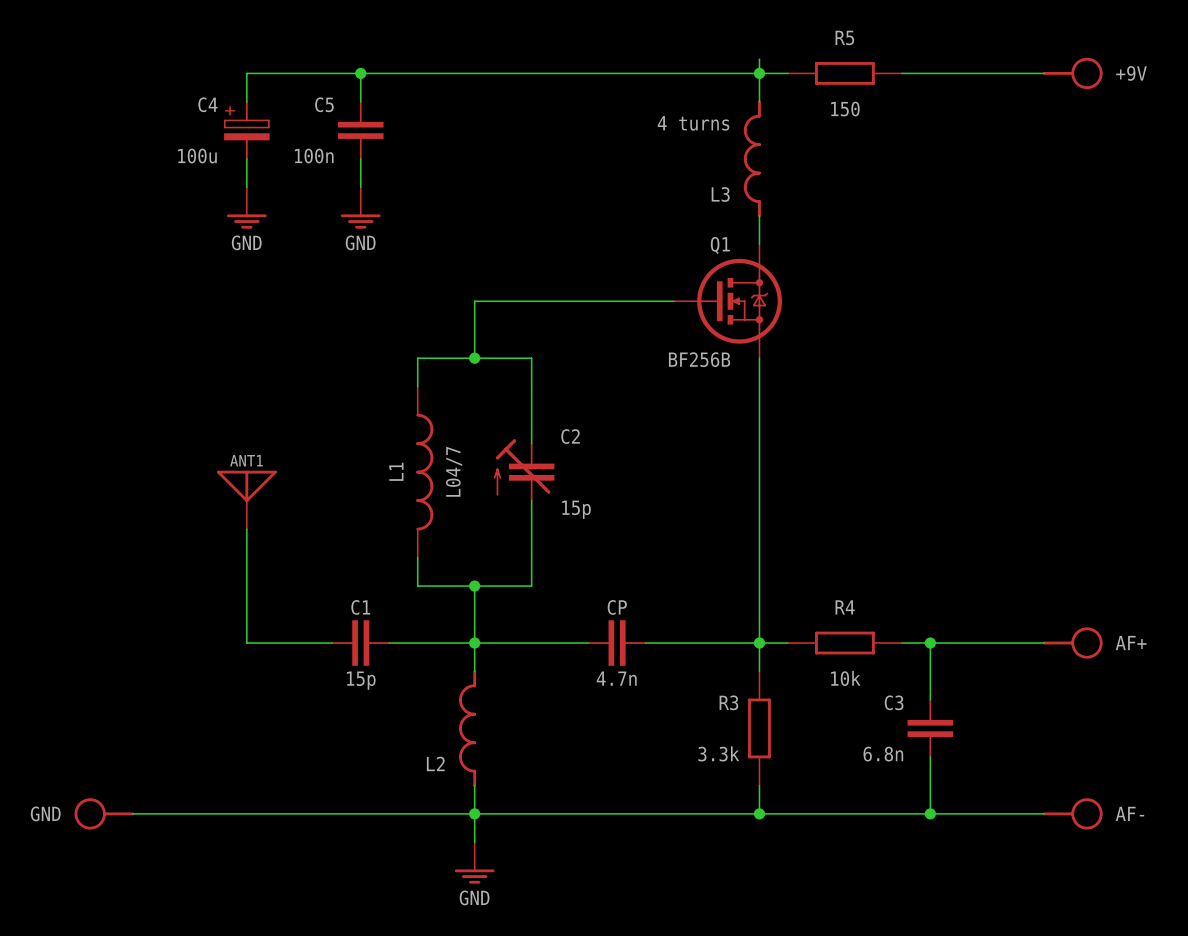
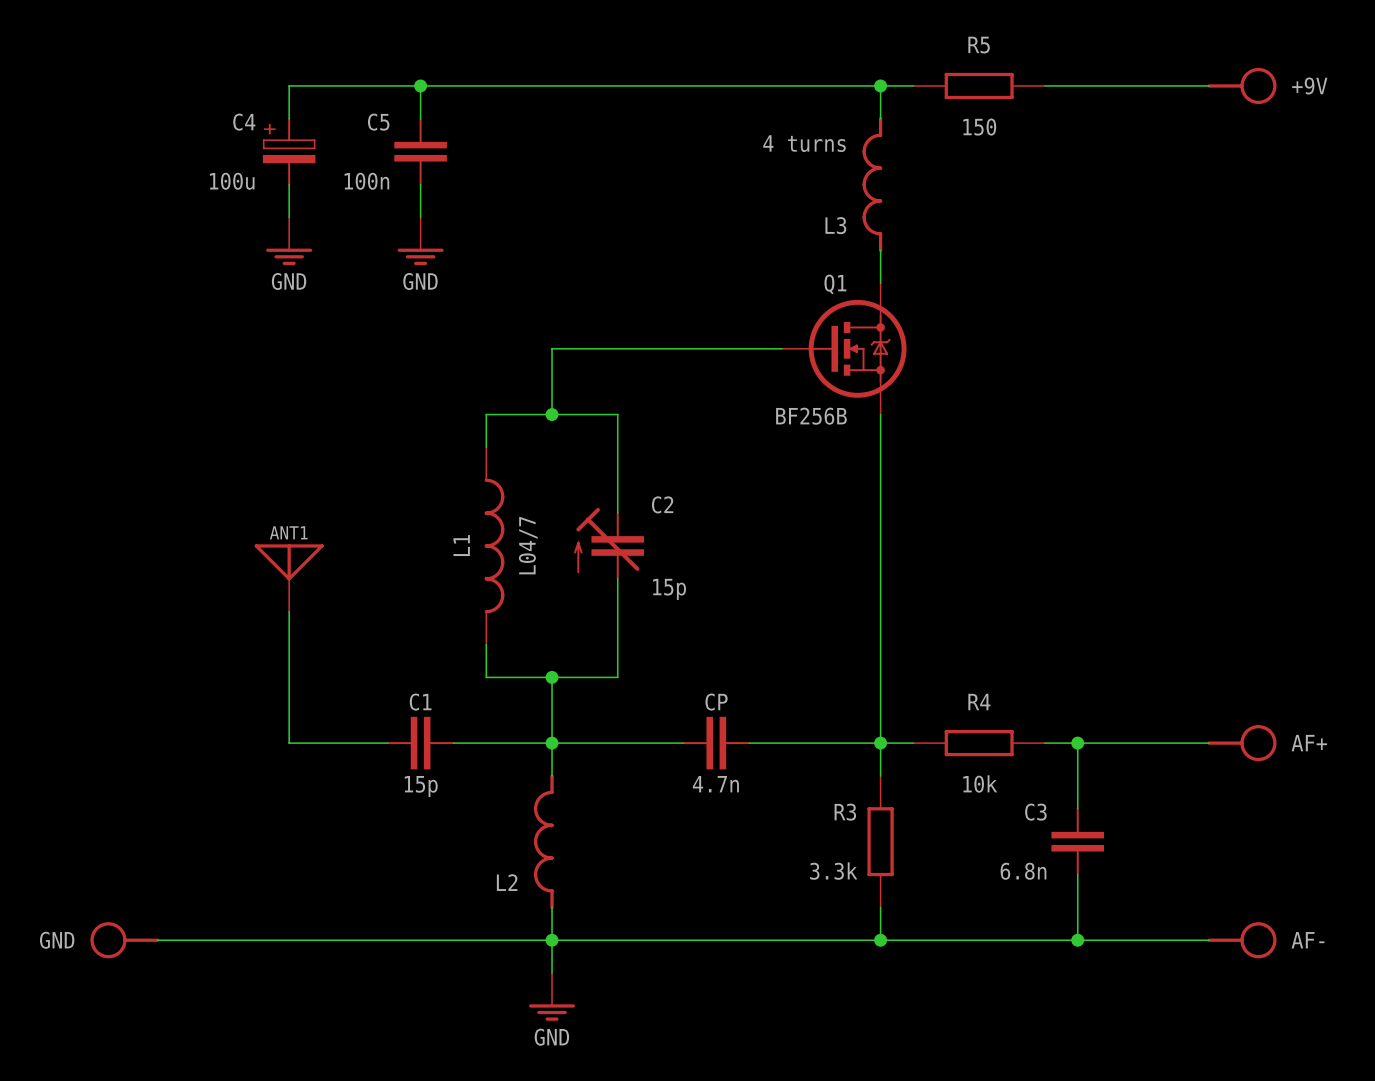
wire: (759, 59) (759, 73) -> none

